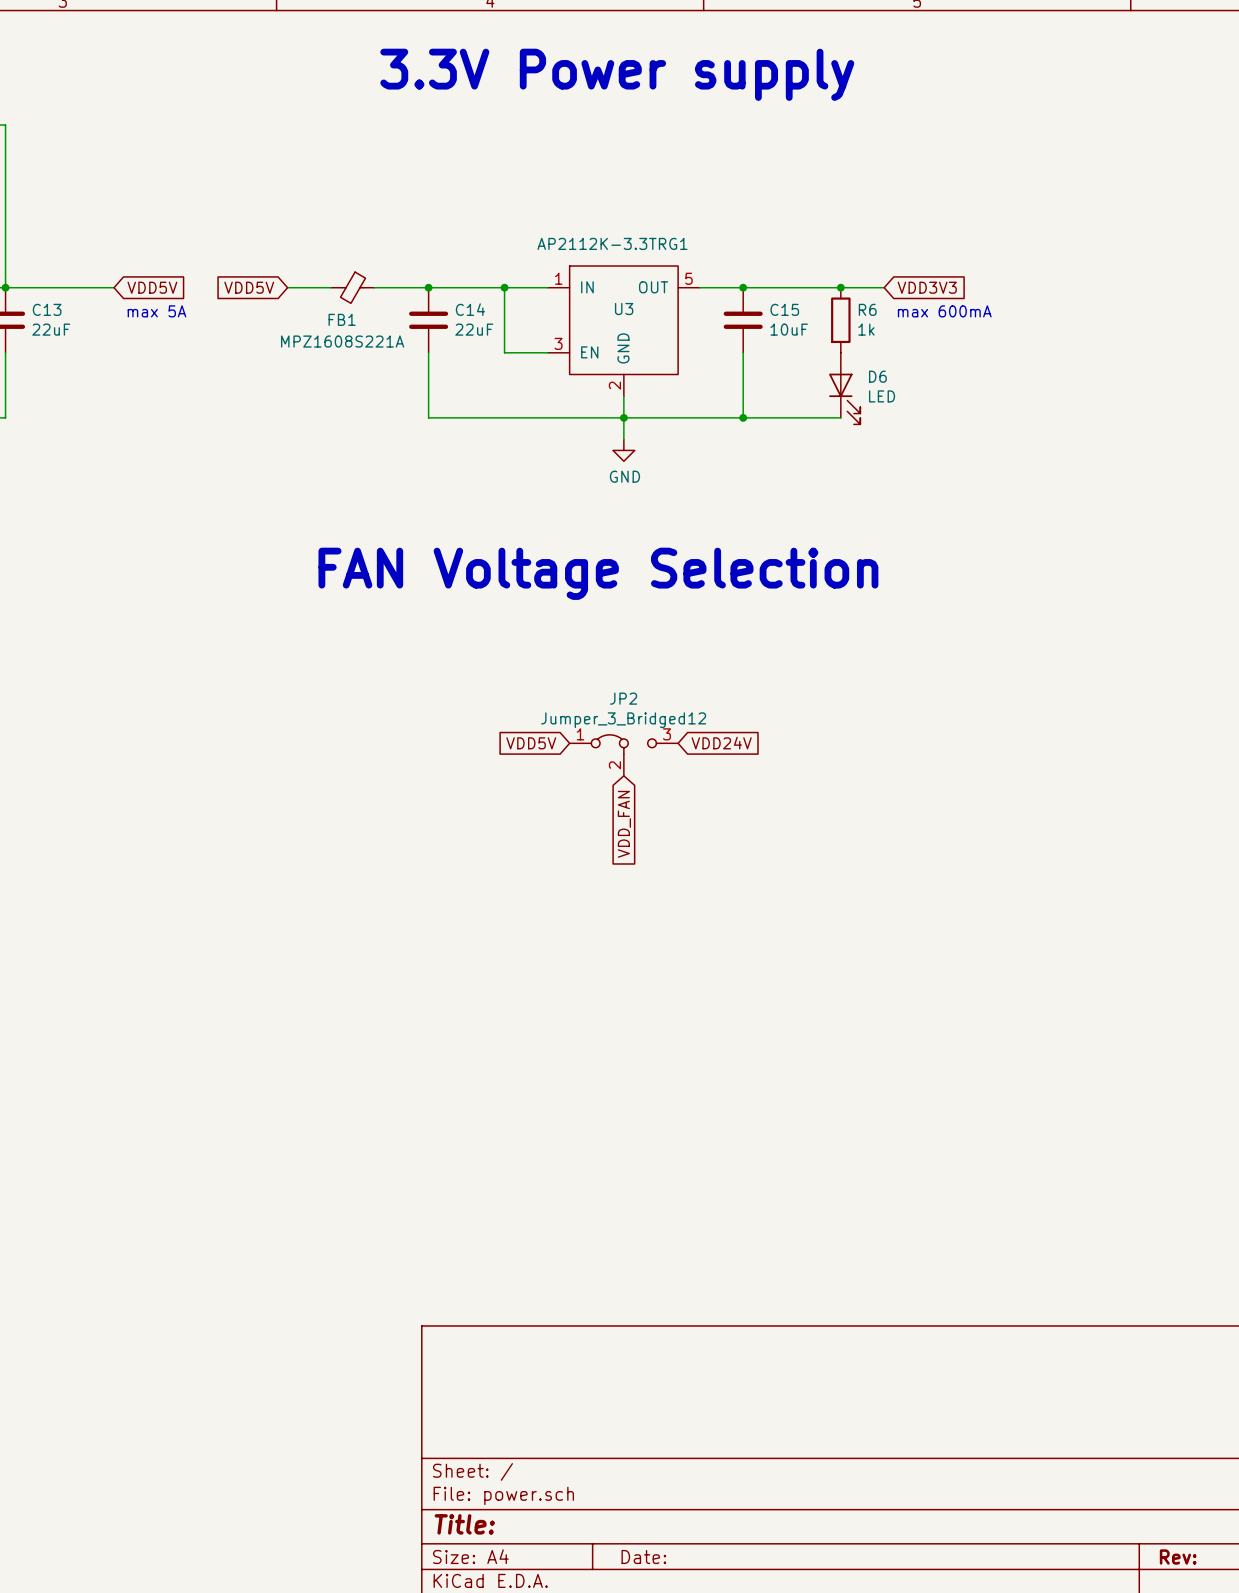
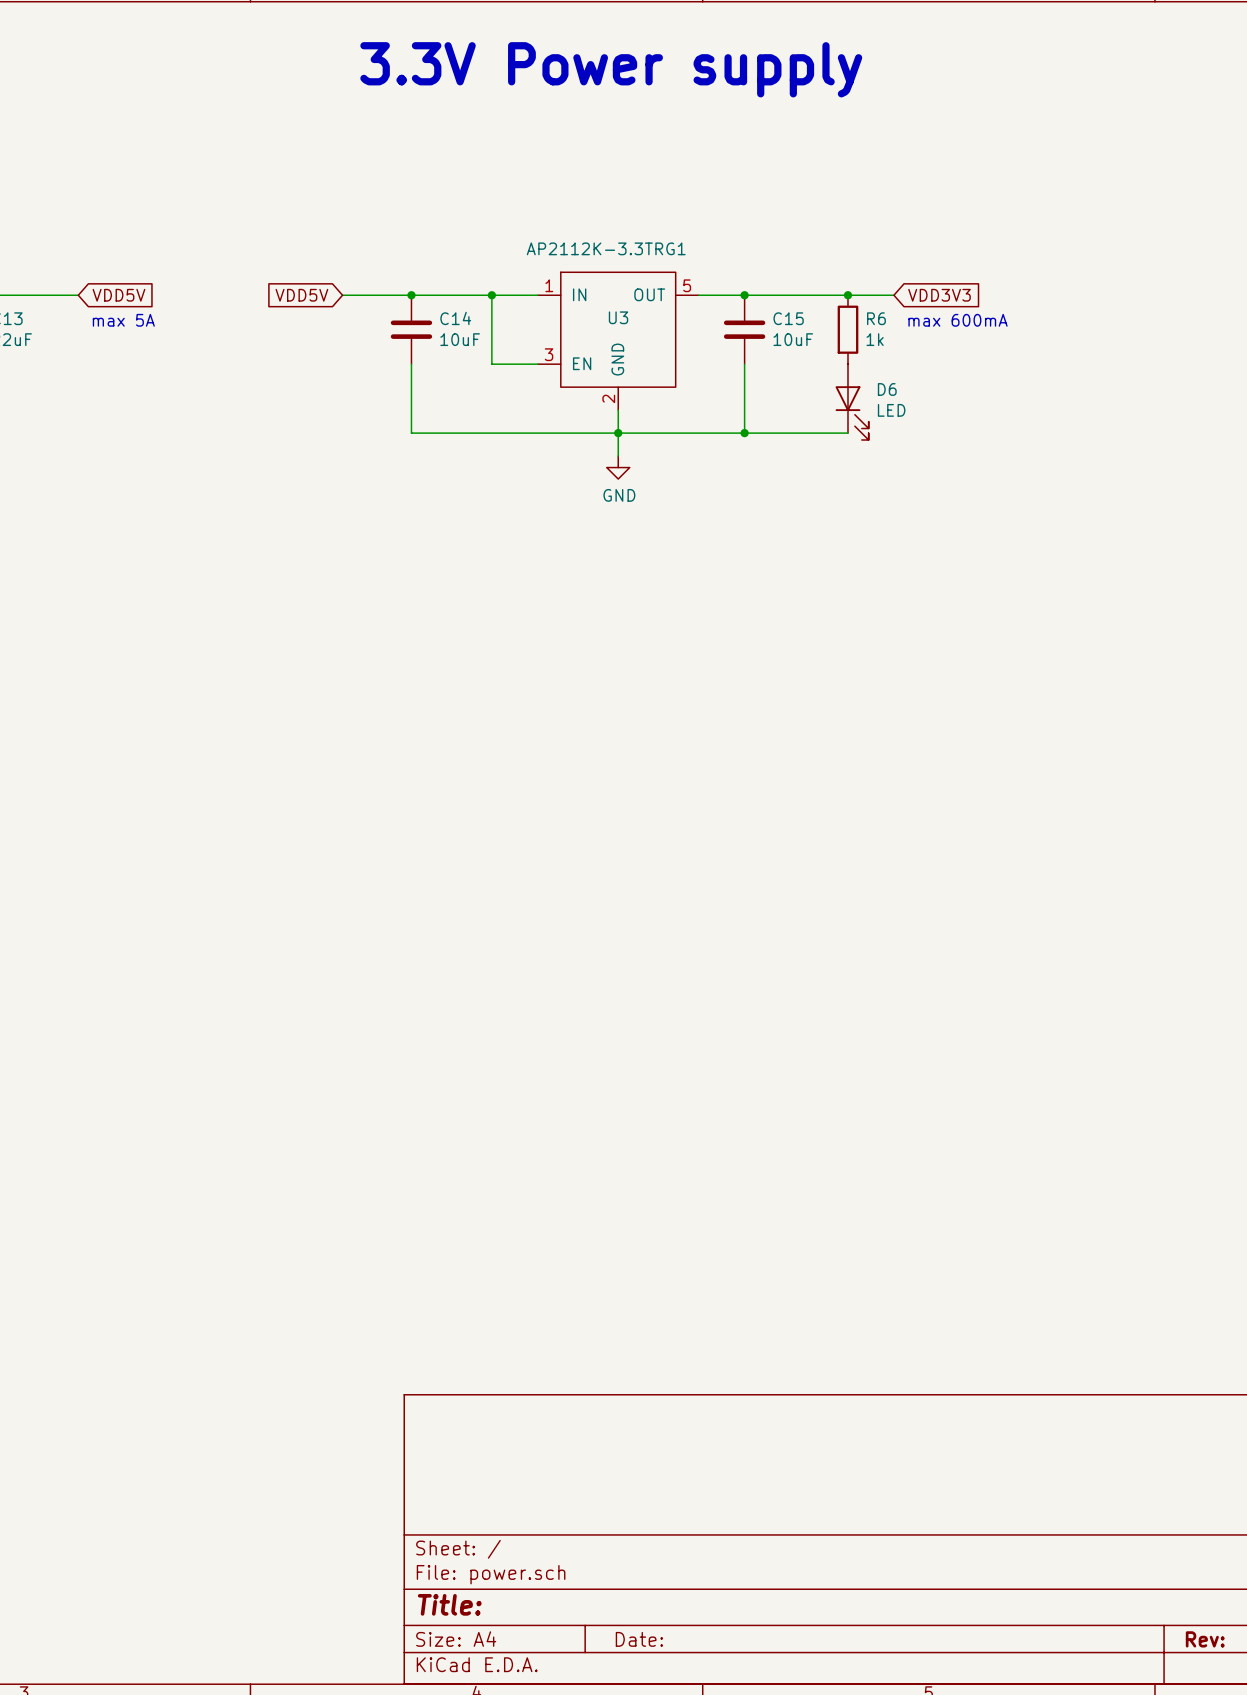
global label position: VDD5V (249, 287) -> VDD5V (301, 295)
wire: (287, 287) (330, 287) -> none
FB1: MPZ1608S221A (352, 287) -> none
C14 value: 22uF (474, 329) -> 10uF (460, 339)
text: FAN Voltage Selection (598, 573) -> none
global label: VDD5V (531, 743) -> none
global label: VDD24V (721, 743) -> none
JP2: Jumper_3_Bridged12 (623, 755) -> none
global label: VDD_FAN (624, 824) -> none

